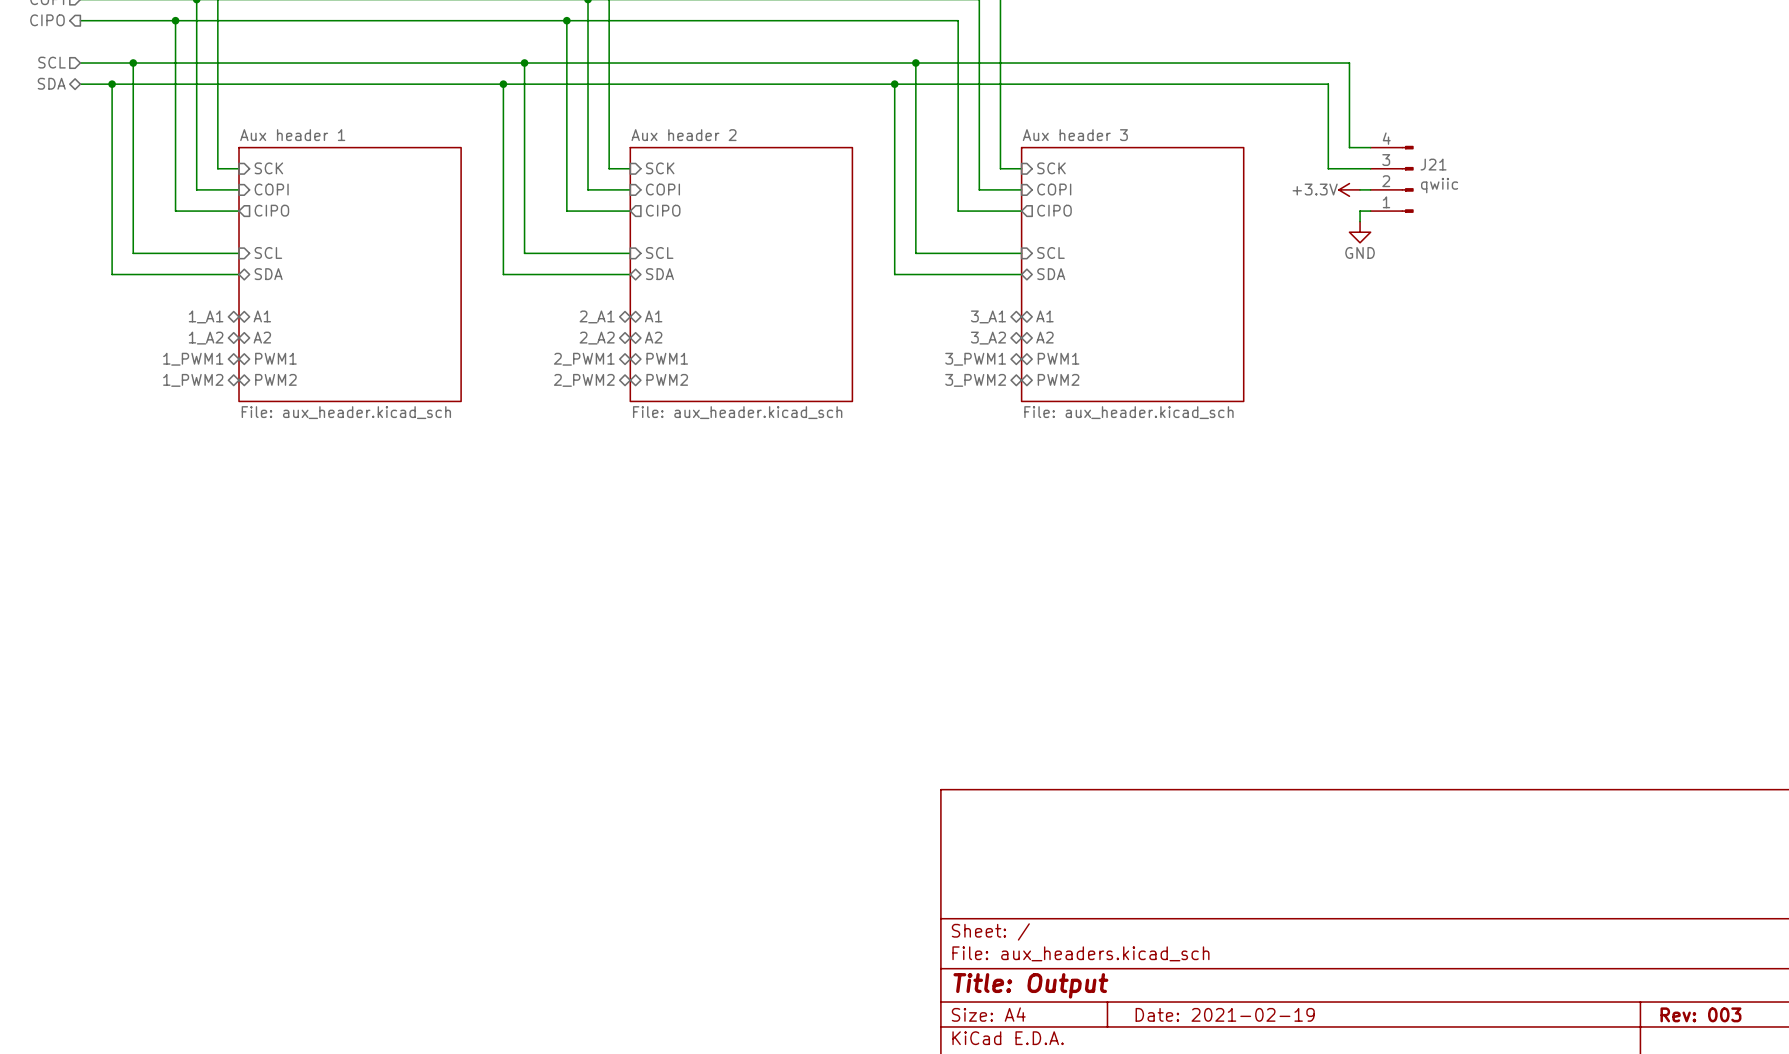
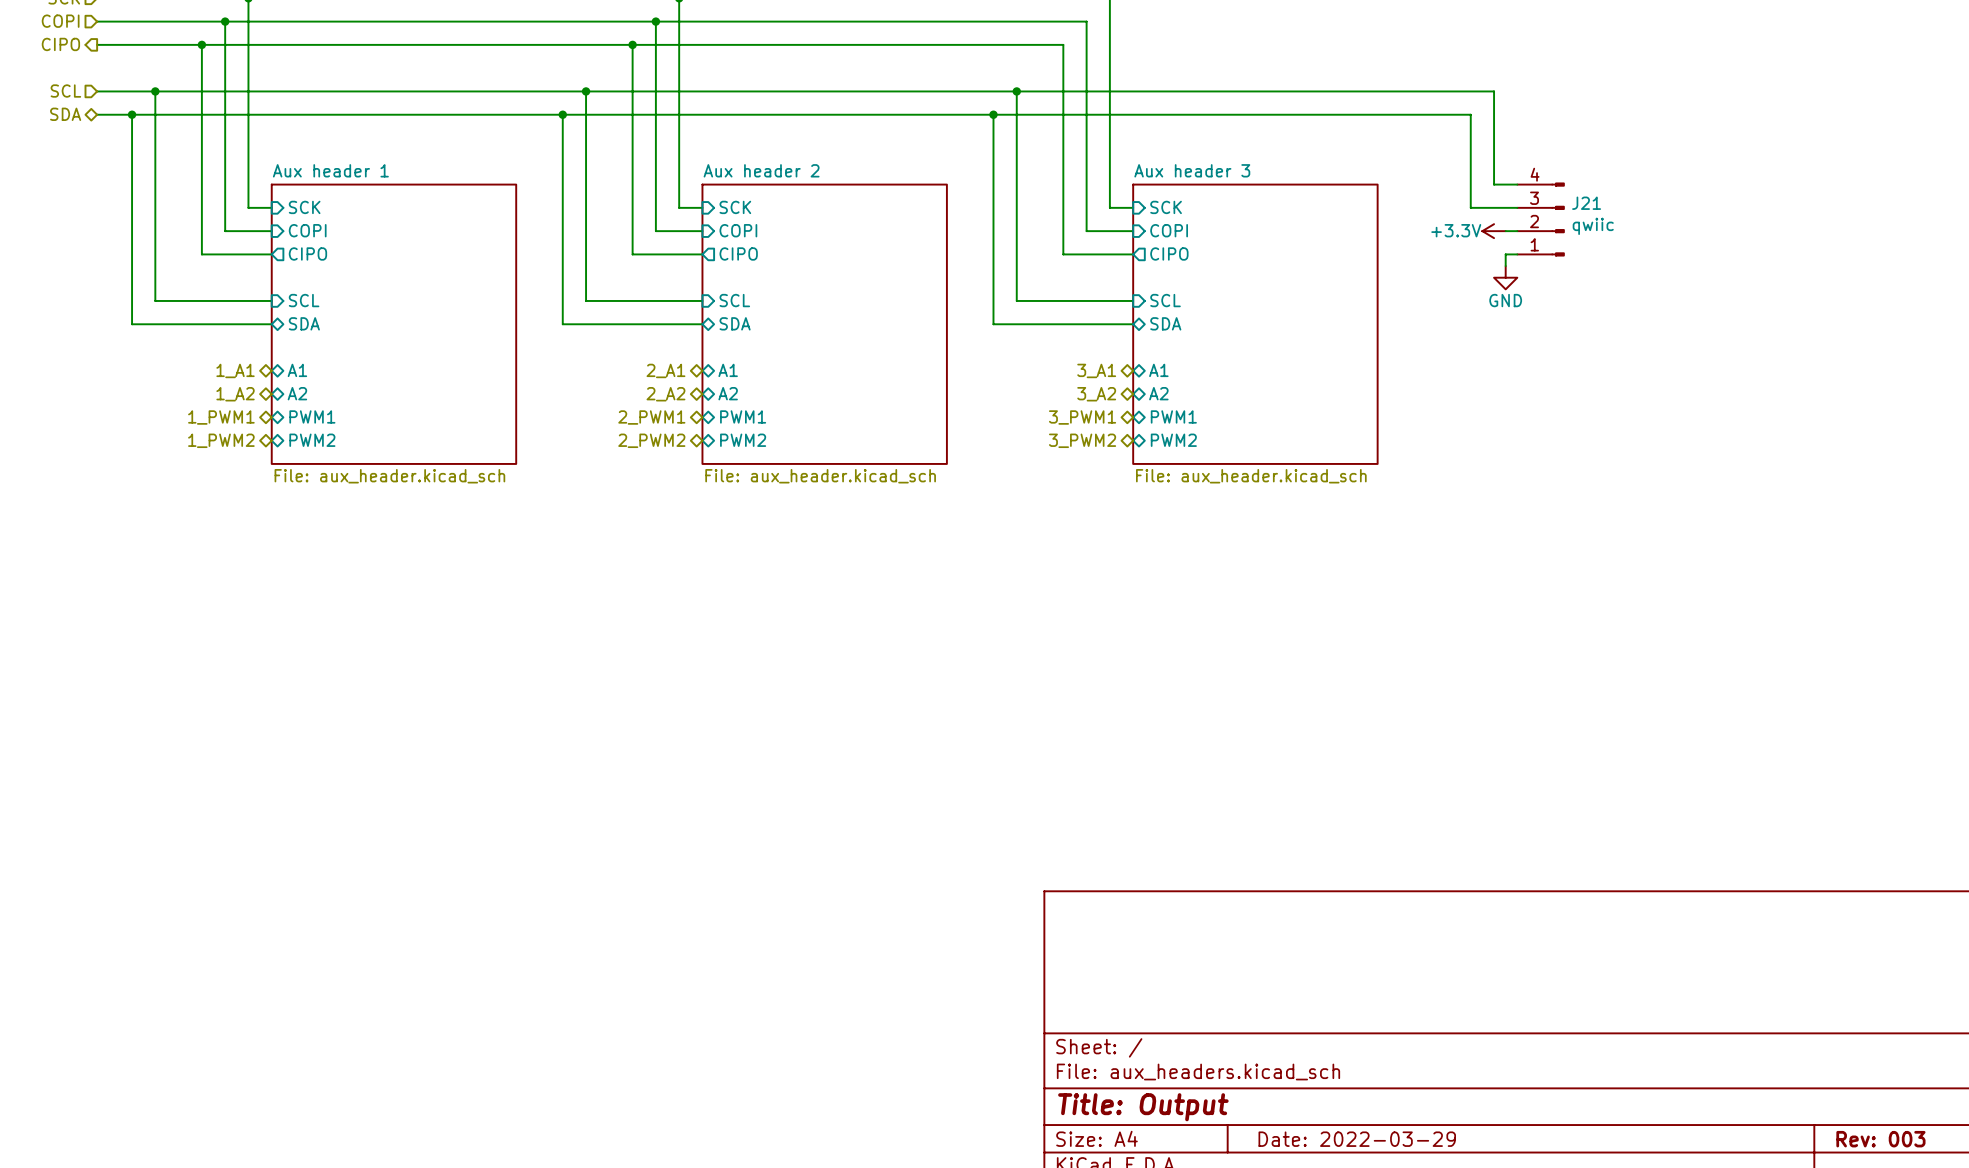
title block: Date: 2021-02-19 (1225, 1014) -> Date: 2022-03-29 (1357, 1139)

